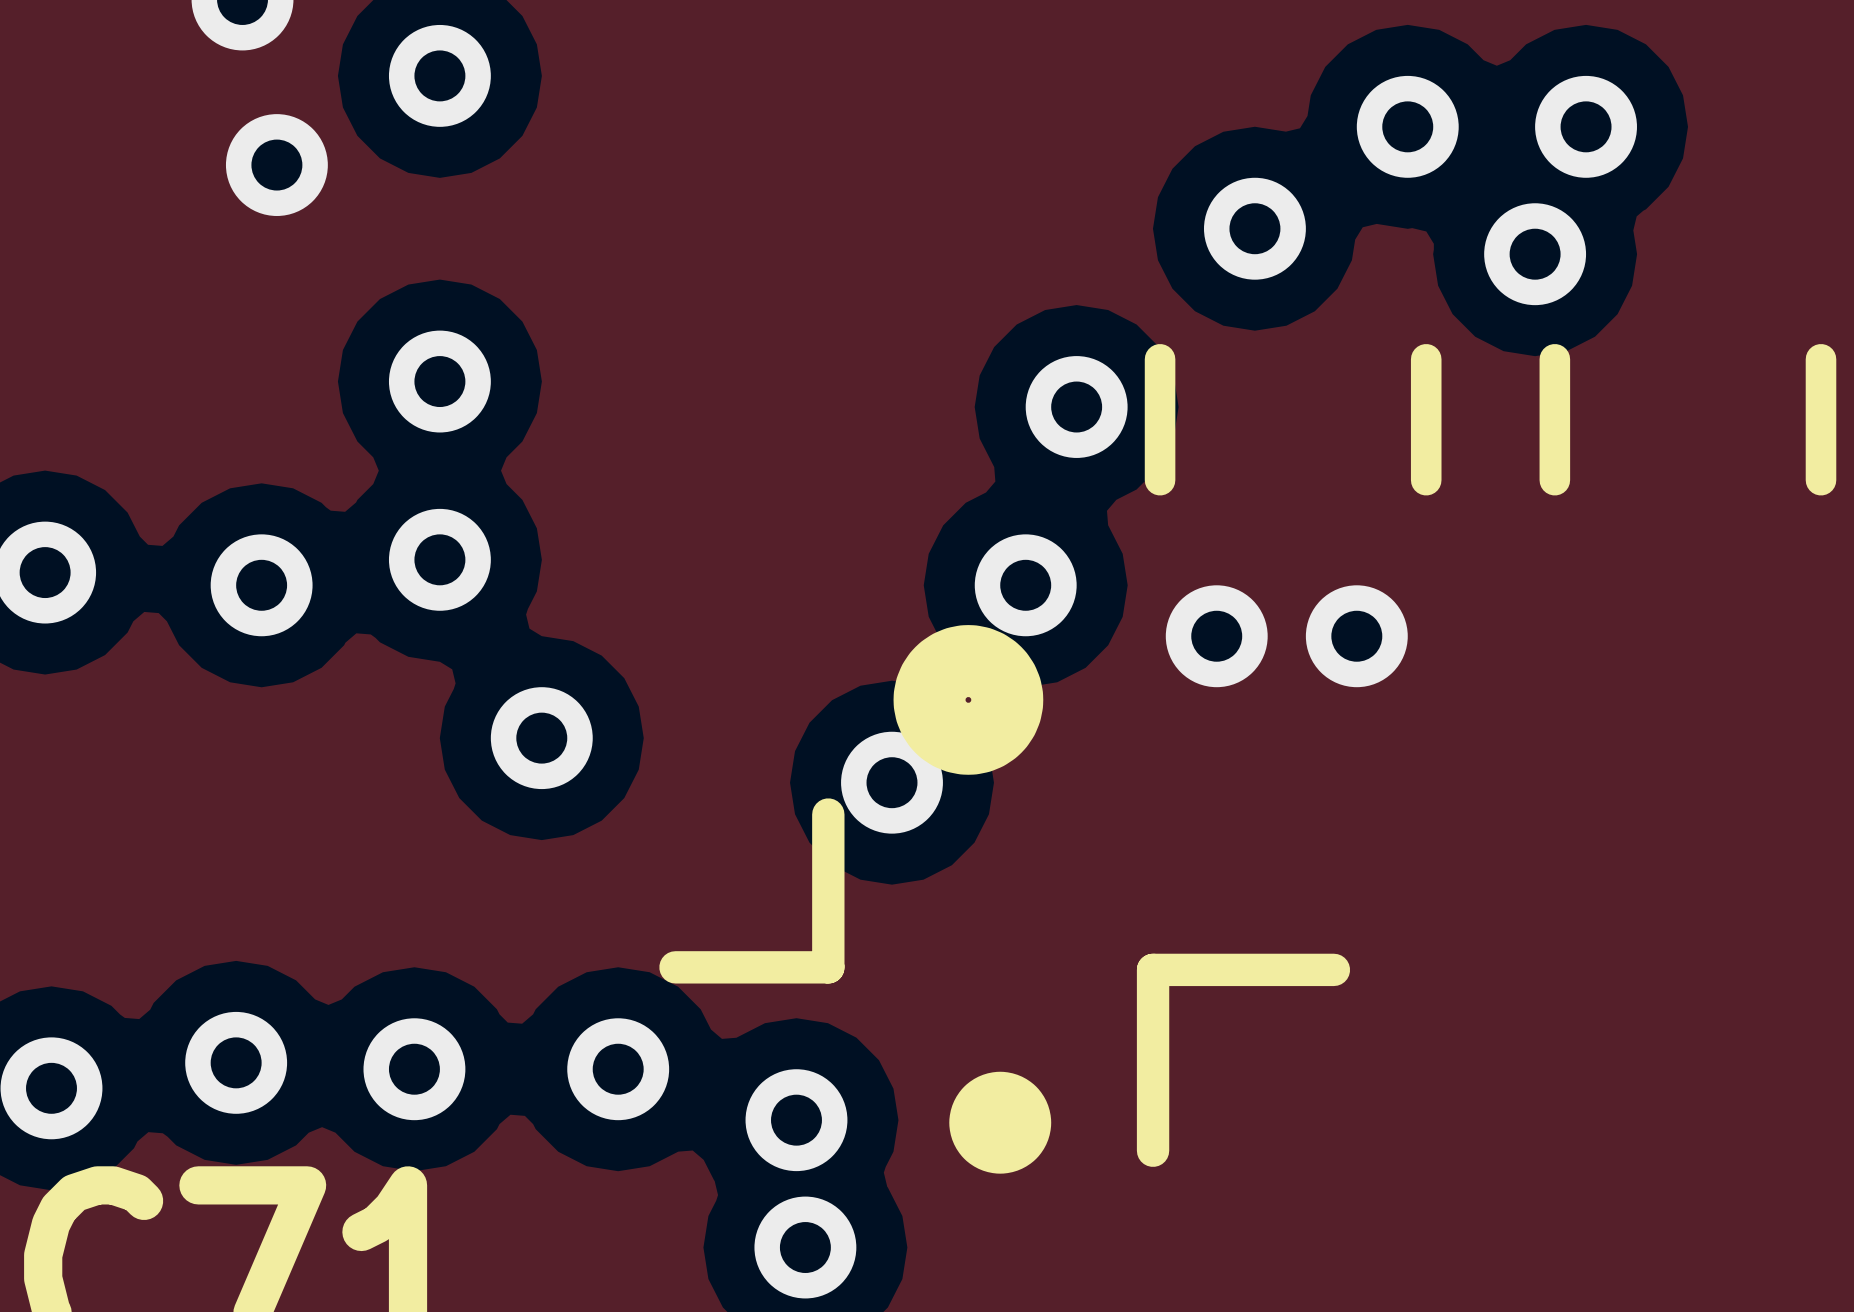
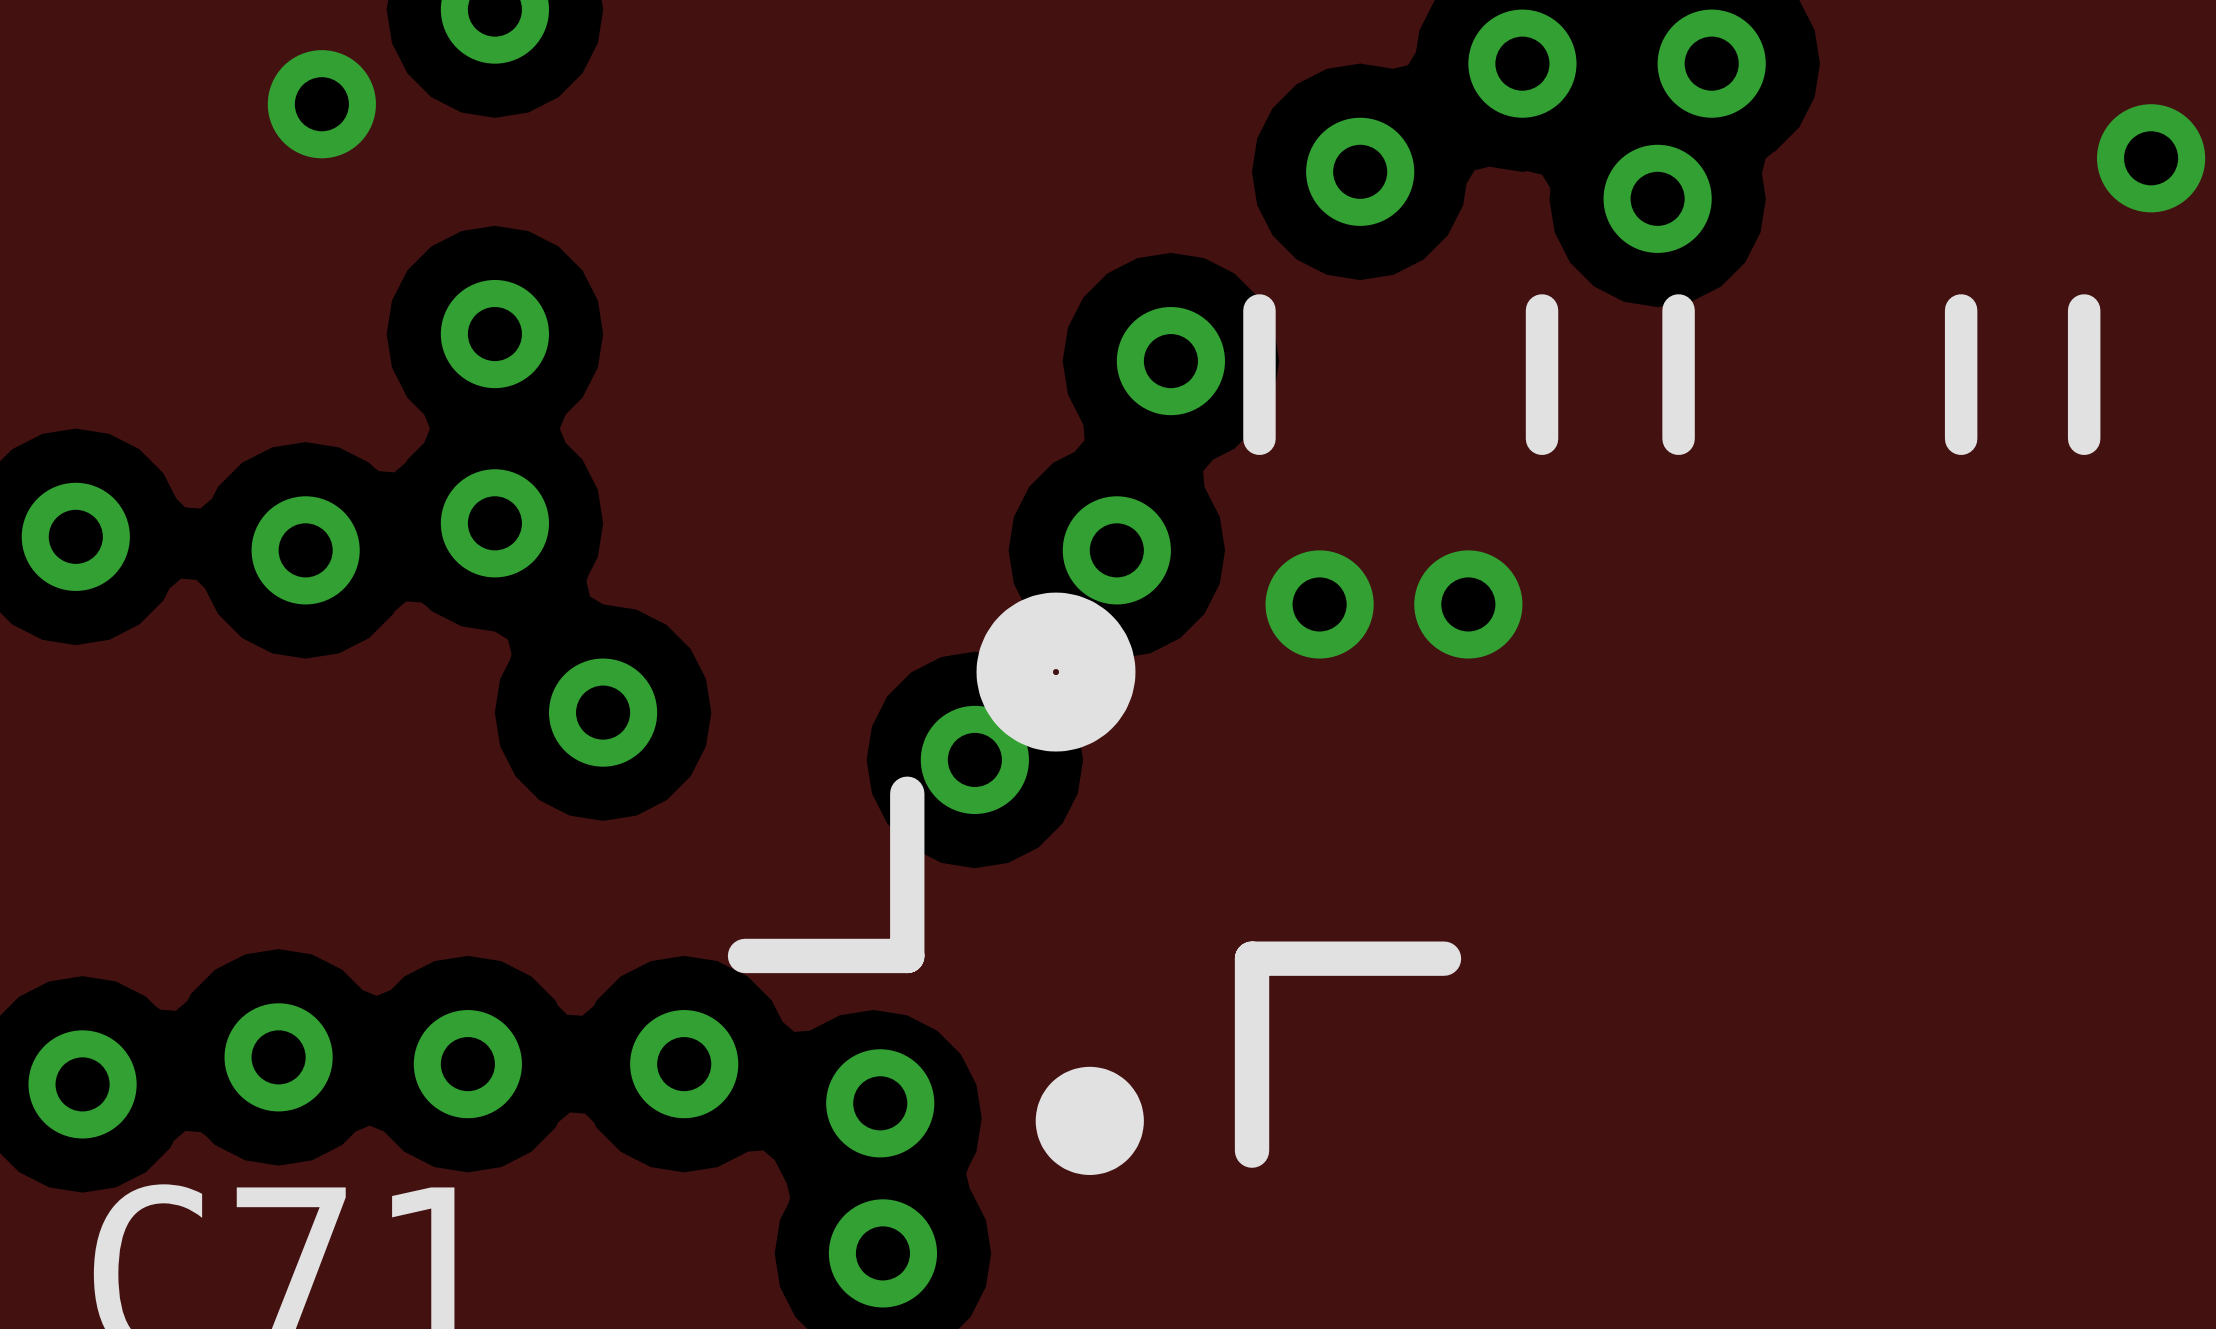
via position: (796, 1120) -> (880, 1103)

